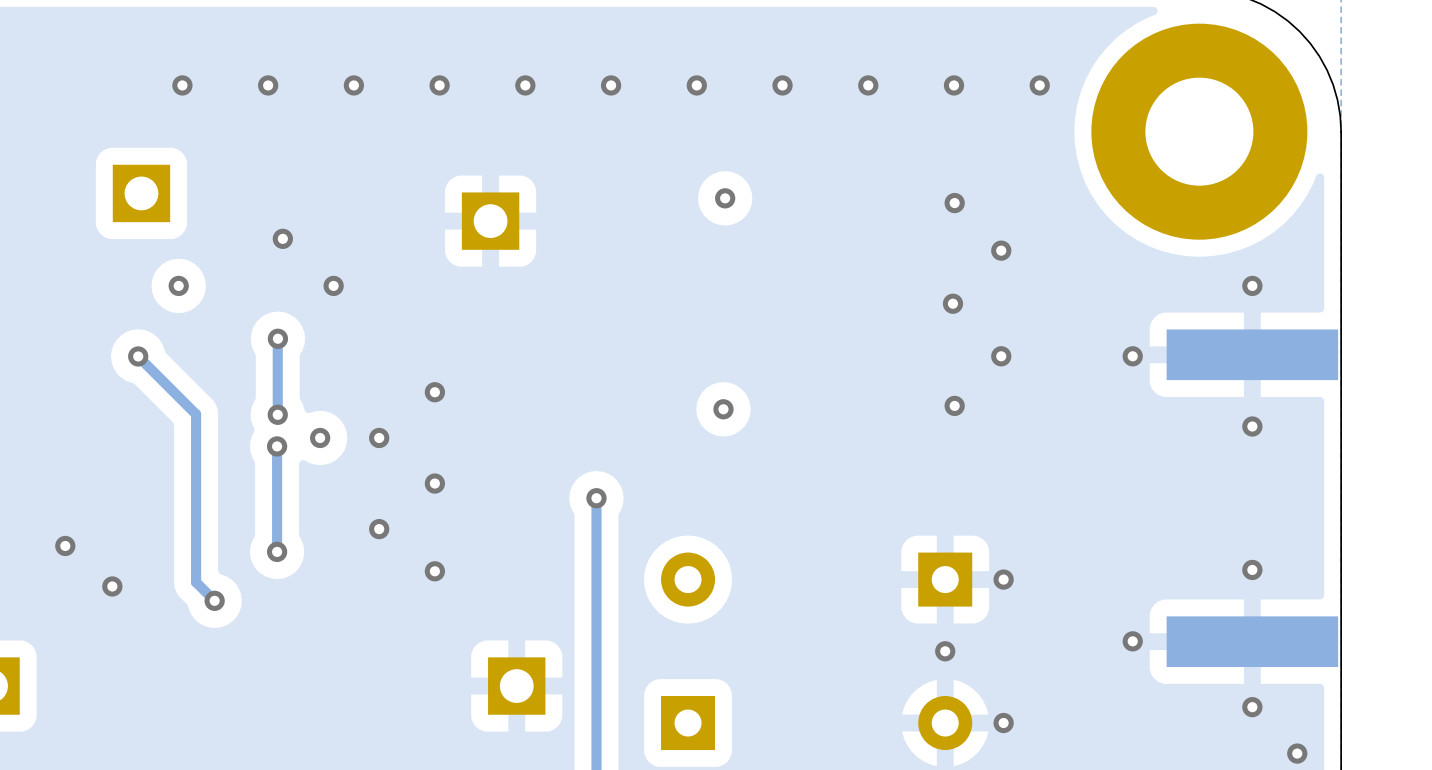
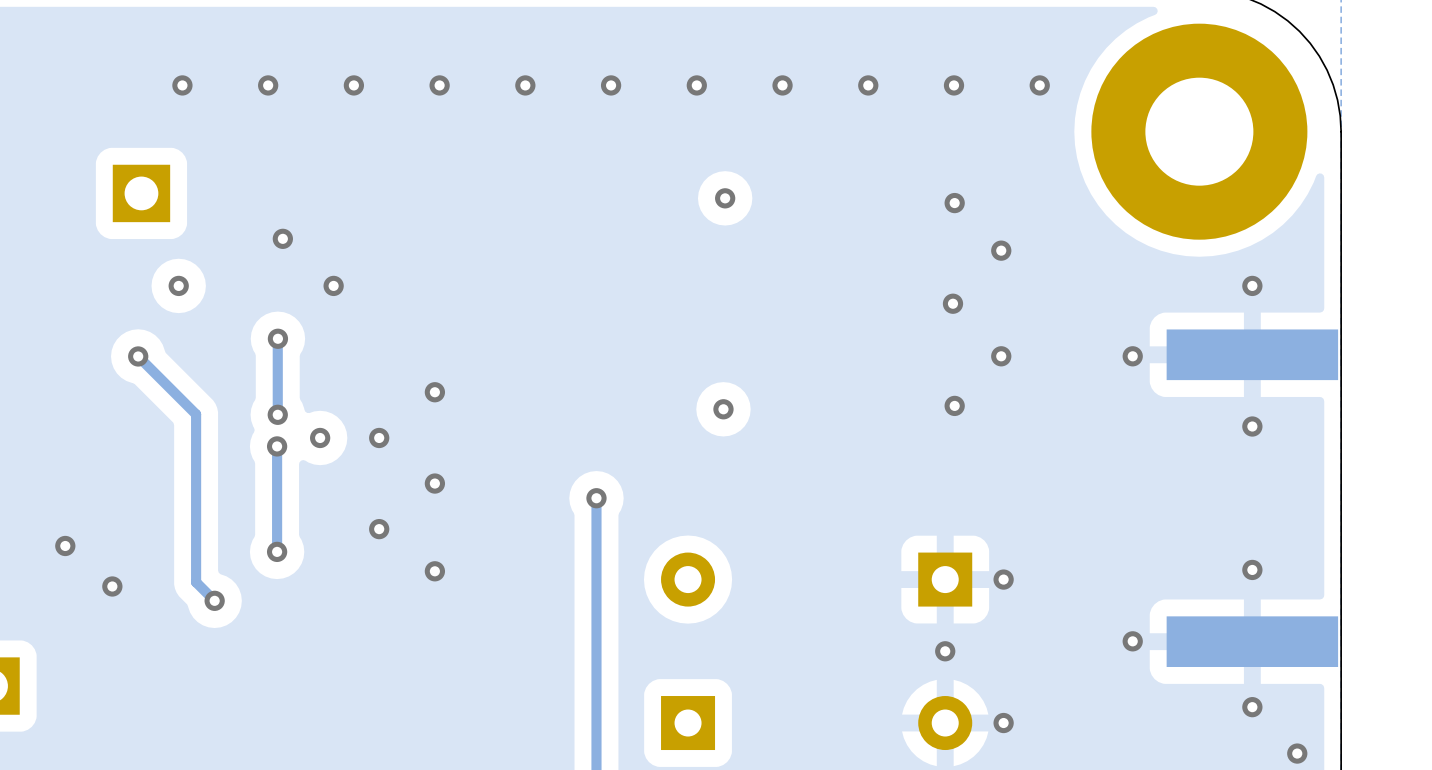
part: (490, 221) -> none
part: (516, 686) -> none

